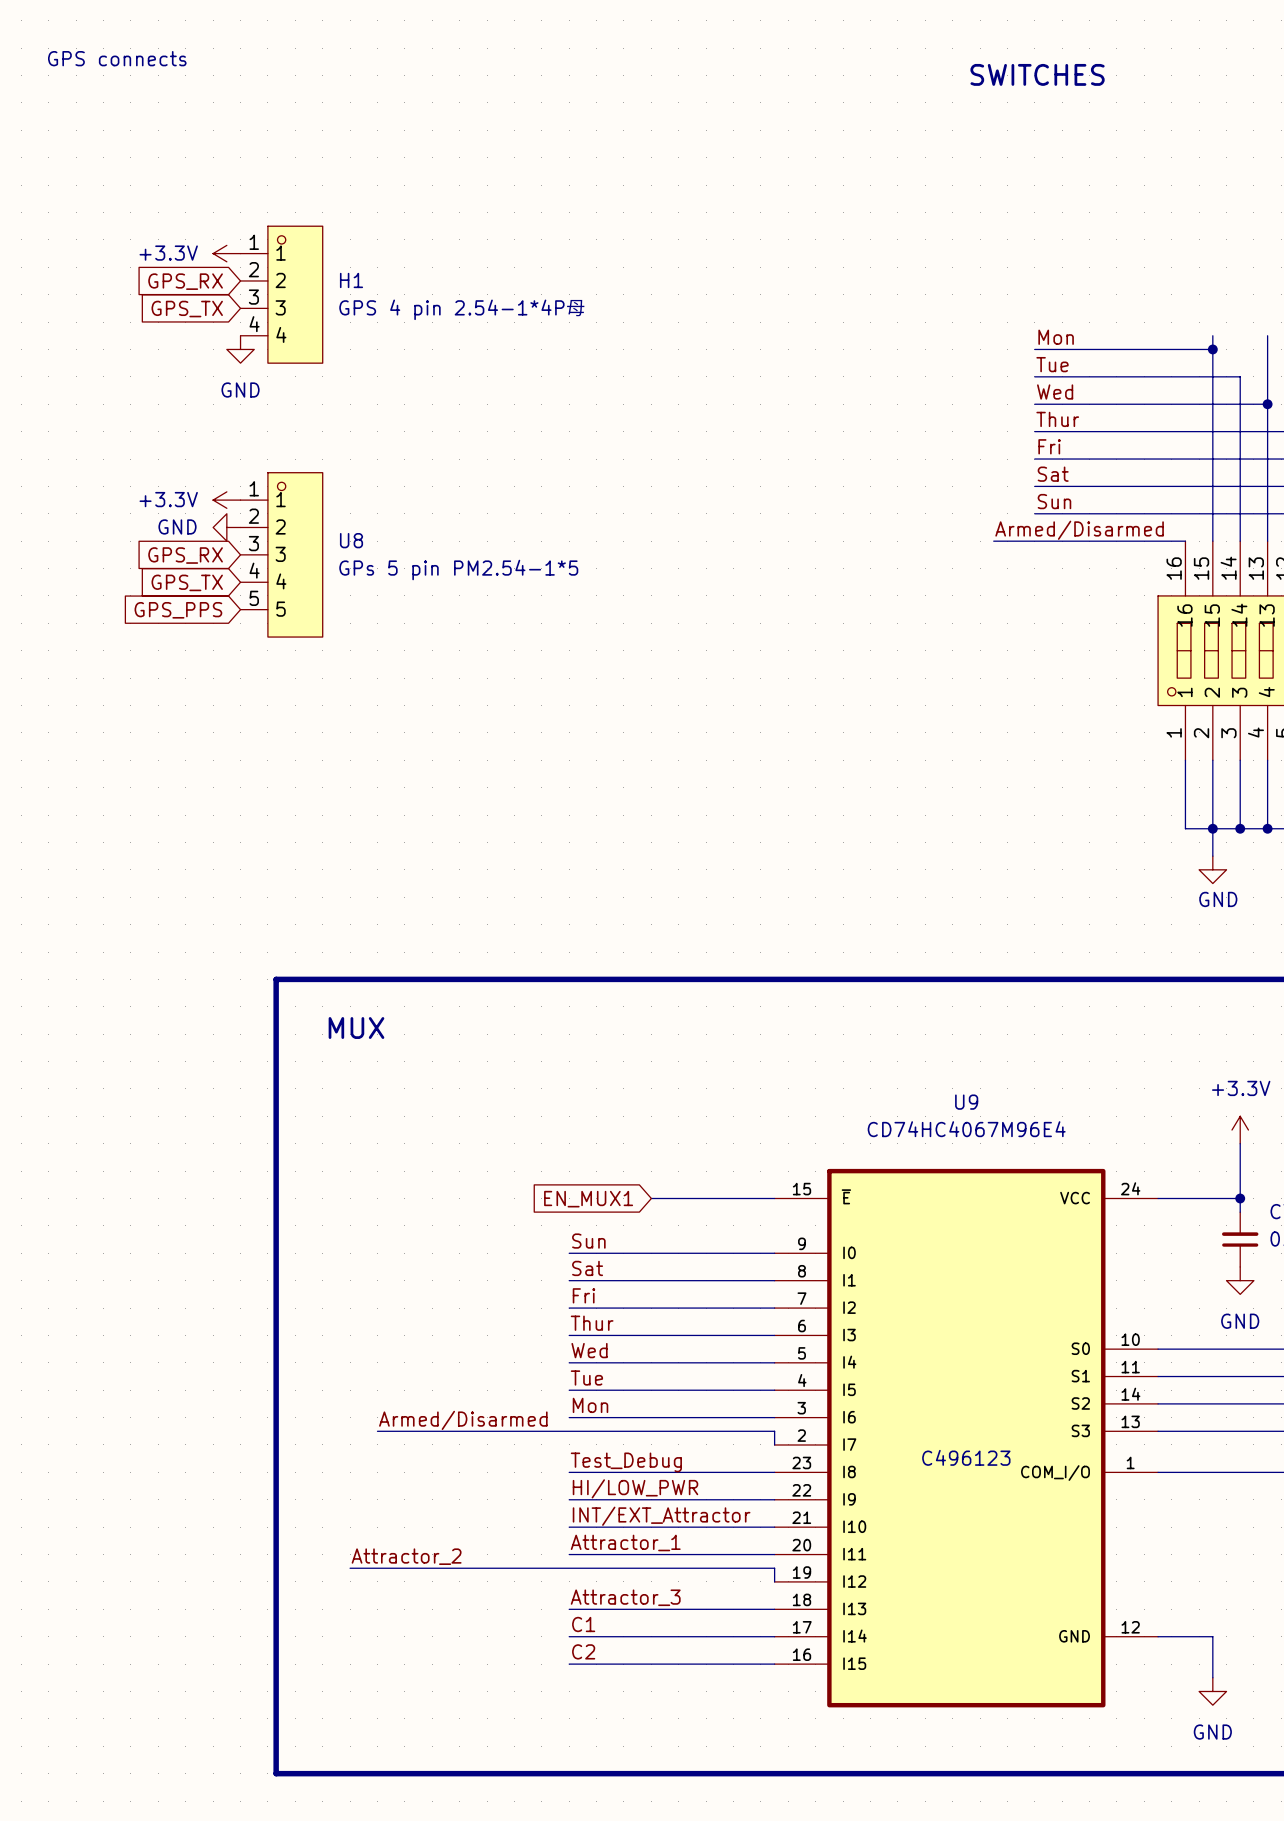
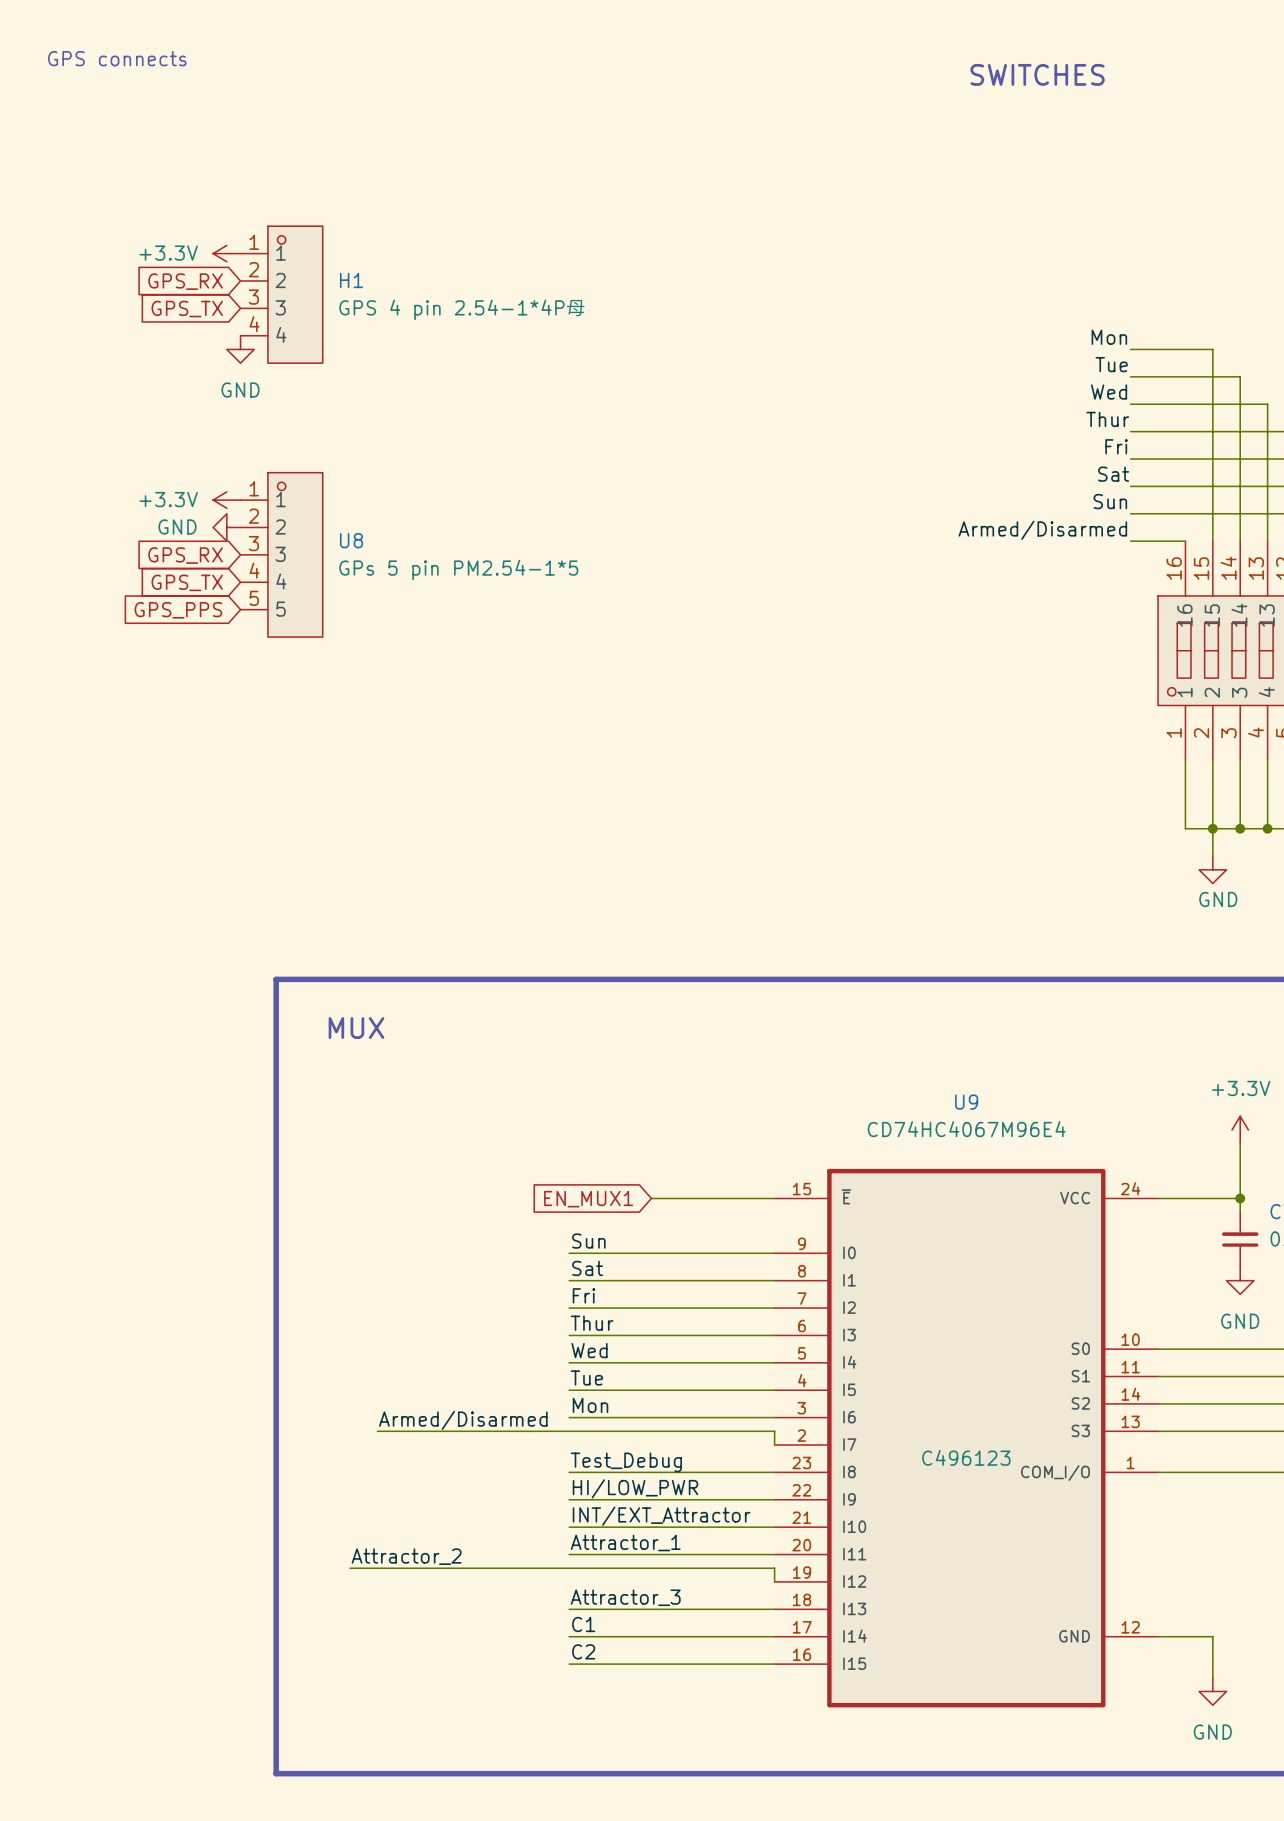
wire: (1212, 335) (1212, 349) -> none
wire: (1267, 335) (1267, 404) -> none
label position: Mon (1056, 337) -> Mon (1109, 337)
wire: (1034, 349) (1130, 349) -> none
junction: (1212, 349) -> none
label position: Tue (1052, 364) -> Tue (1111, 364)
wire: (1034, 376) (1130, 376) -> none
label position: Wed (1055, 392) -> Wed (1109, 392)
wire: (1034, 404) (1130, 404) -> none
junction: (1267, 404) -> none
label position: Thur (1057, 419) -> Thur (1107, 419)
wire: (1034, 431) (1130, 431) -> none
label position: Fri (1049, 446) -> Fri (1116, 446)
wire: (1034, 459) (1130, 459) -> none
label position: Sat (1053, 474) -> Sat (1113, 474)
wire: (1034, 486) (1130, 486) -> none
label position: Sun (1054, 501) -> Sun (1110, 501)
wire: (1034, 513) (1130, 513) -> none
label position: Armed/Disarmed (1079, 530) -> Armed/Disarmed (1042, 530)
wire: (993, 541) (1130, 541) -> none

